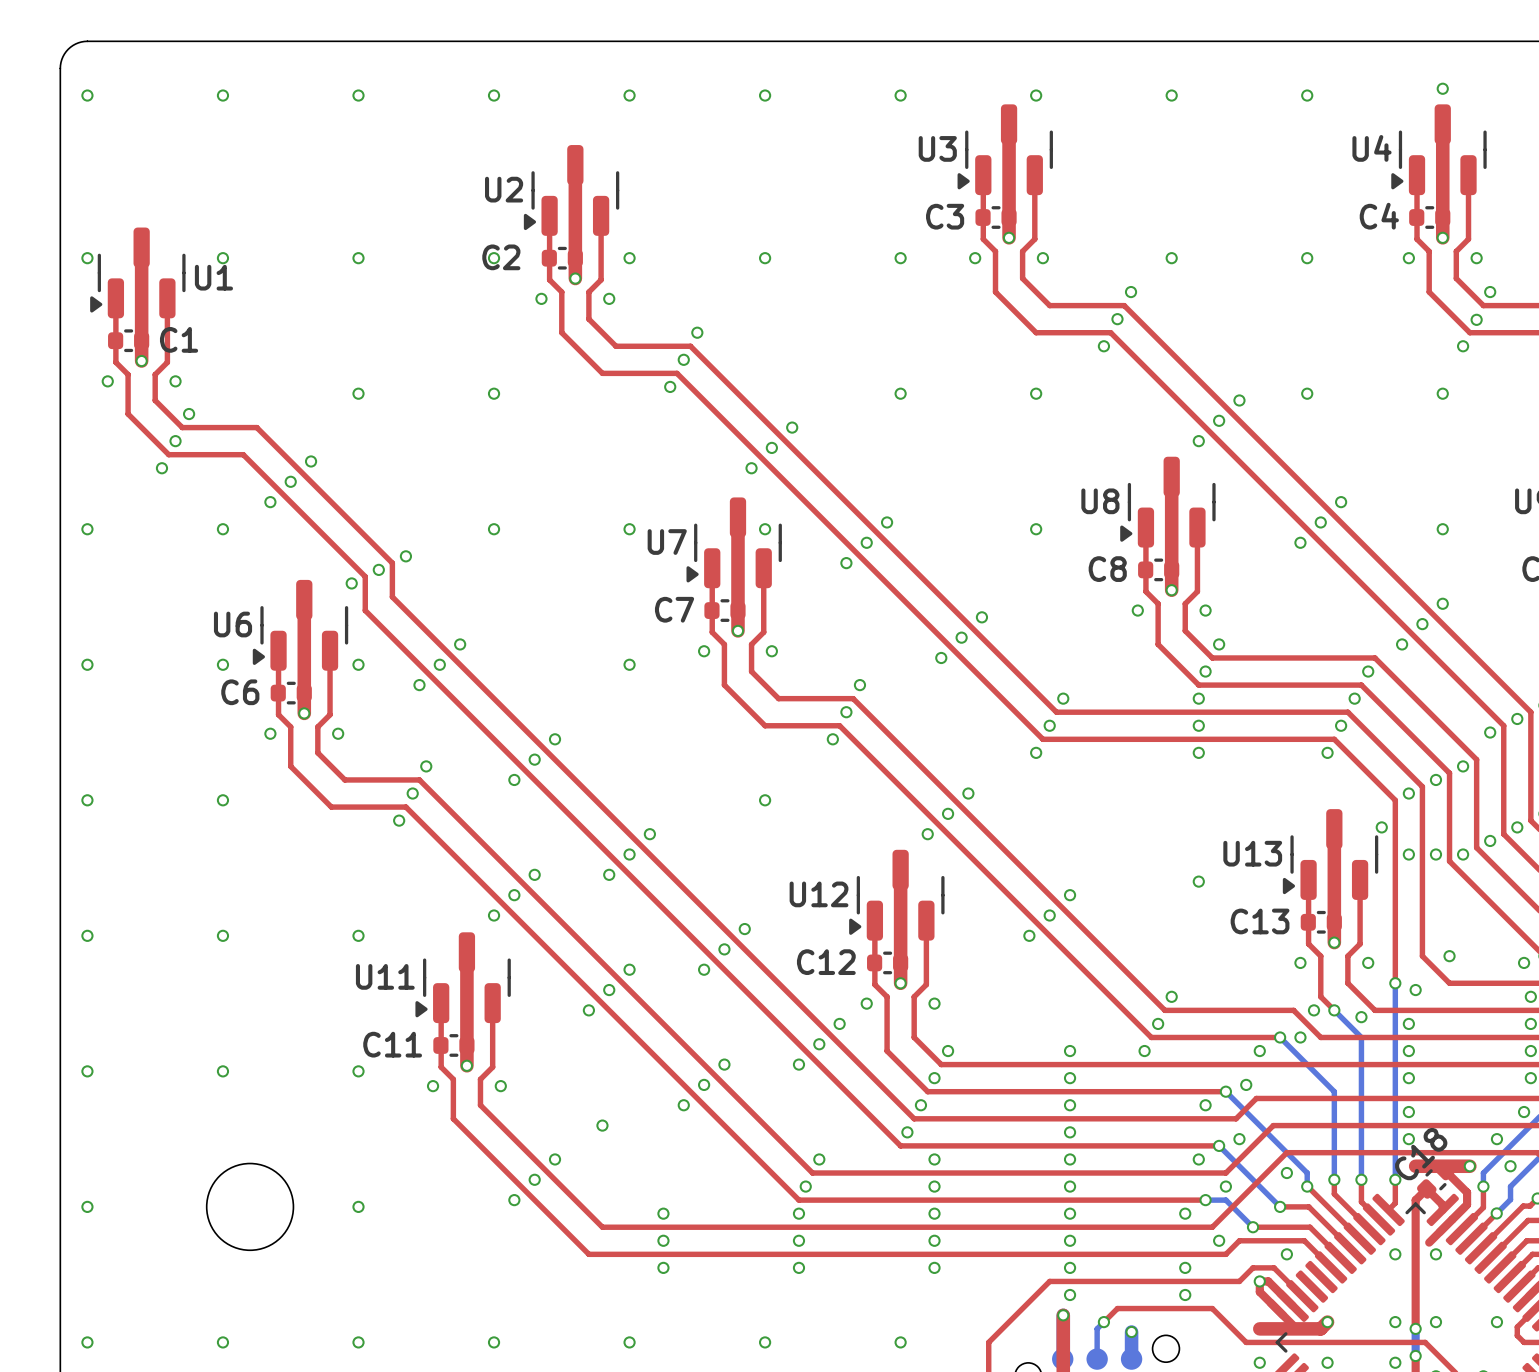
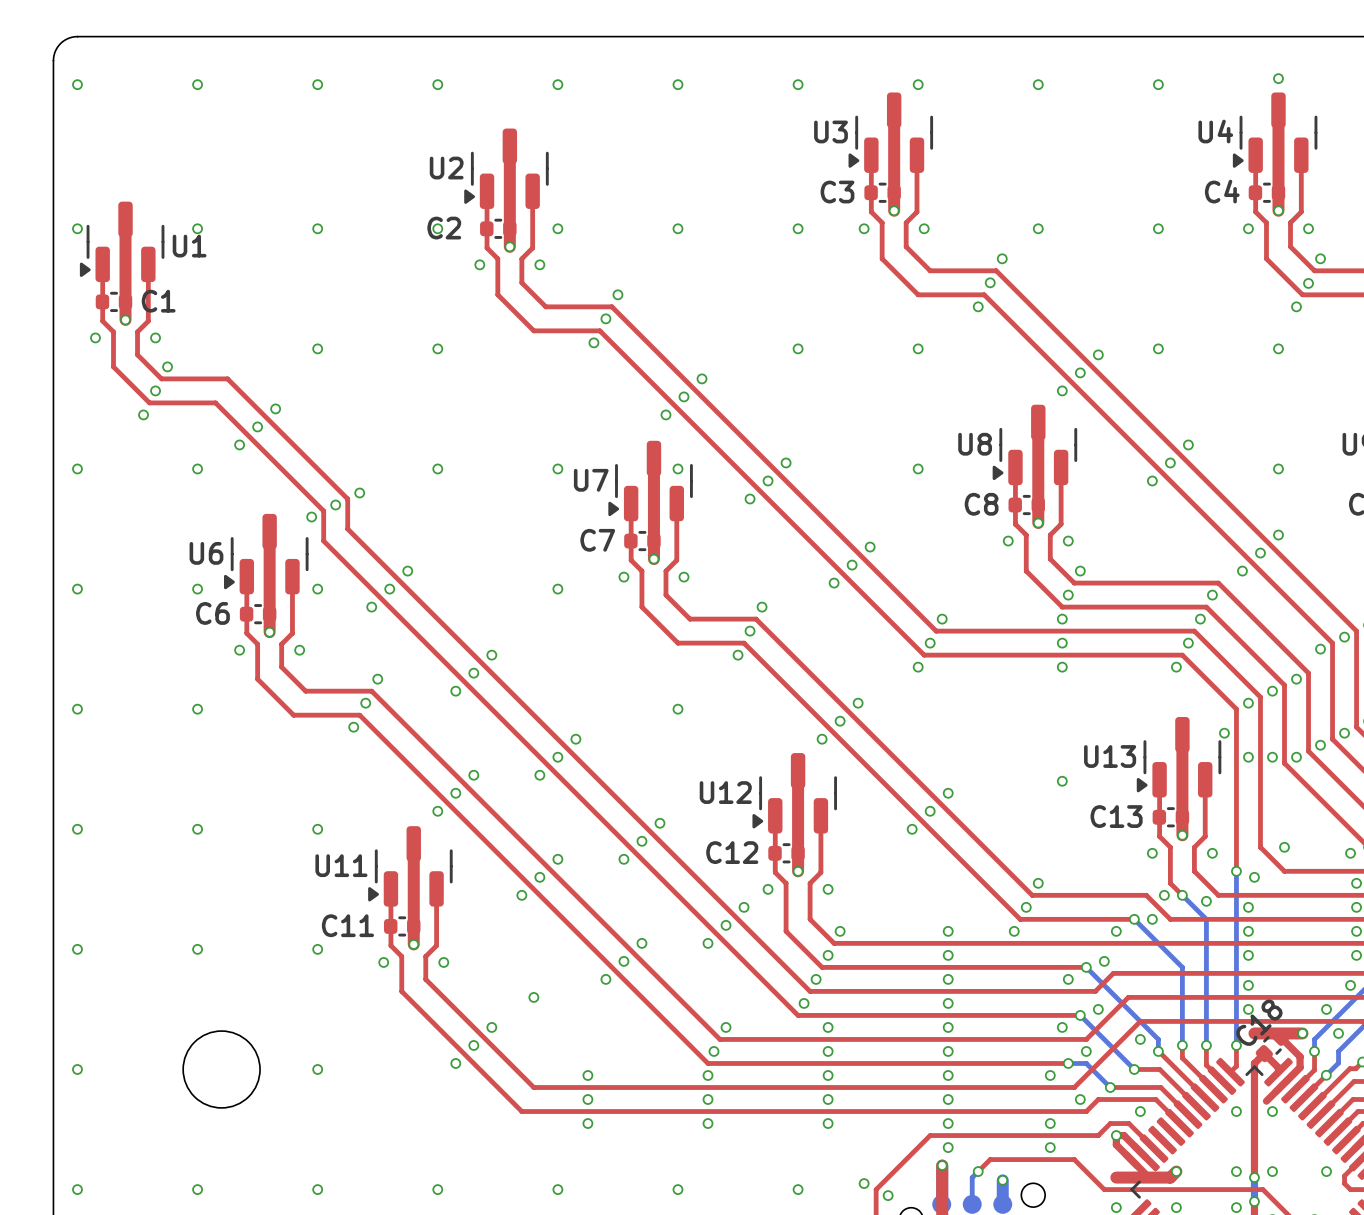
via: none -> (864, 1183)
via: none -> (888, 1195)

